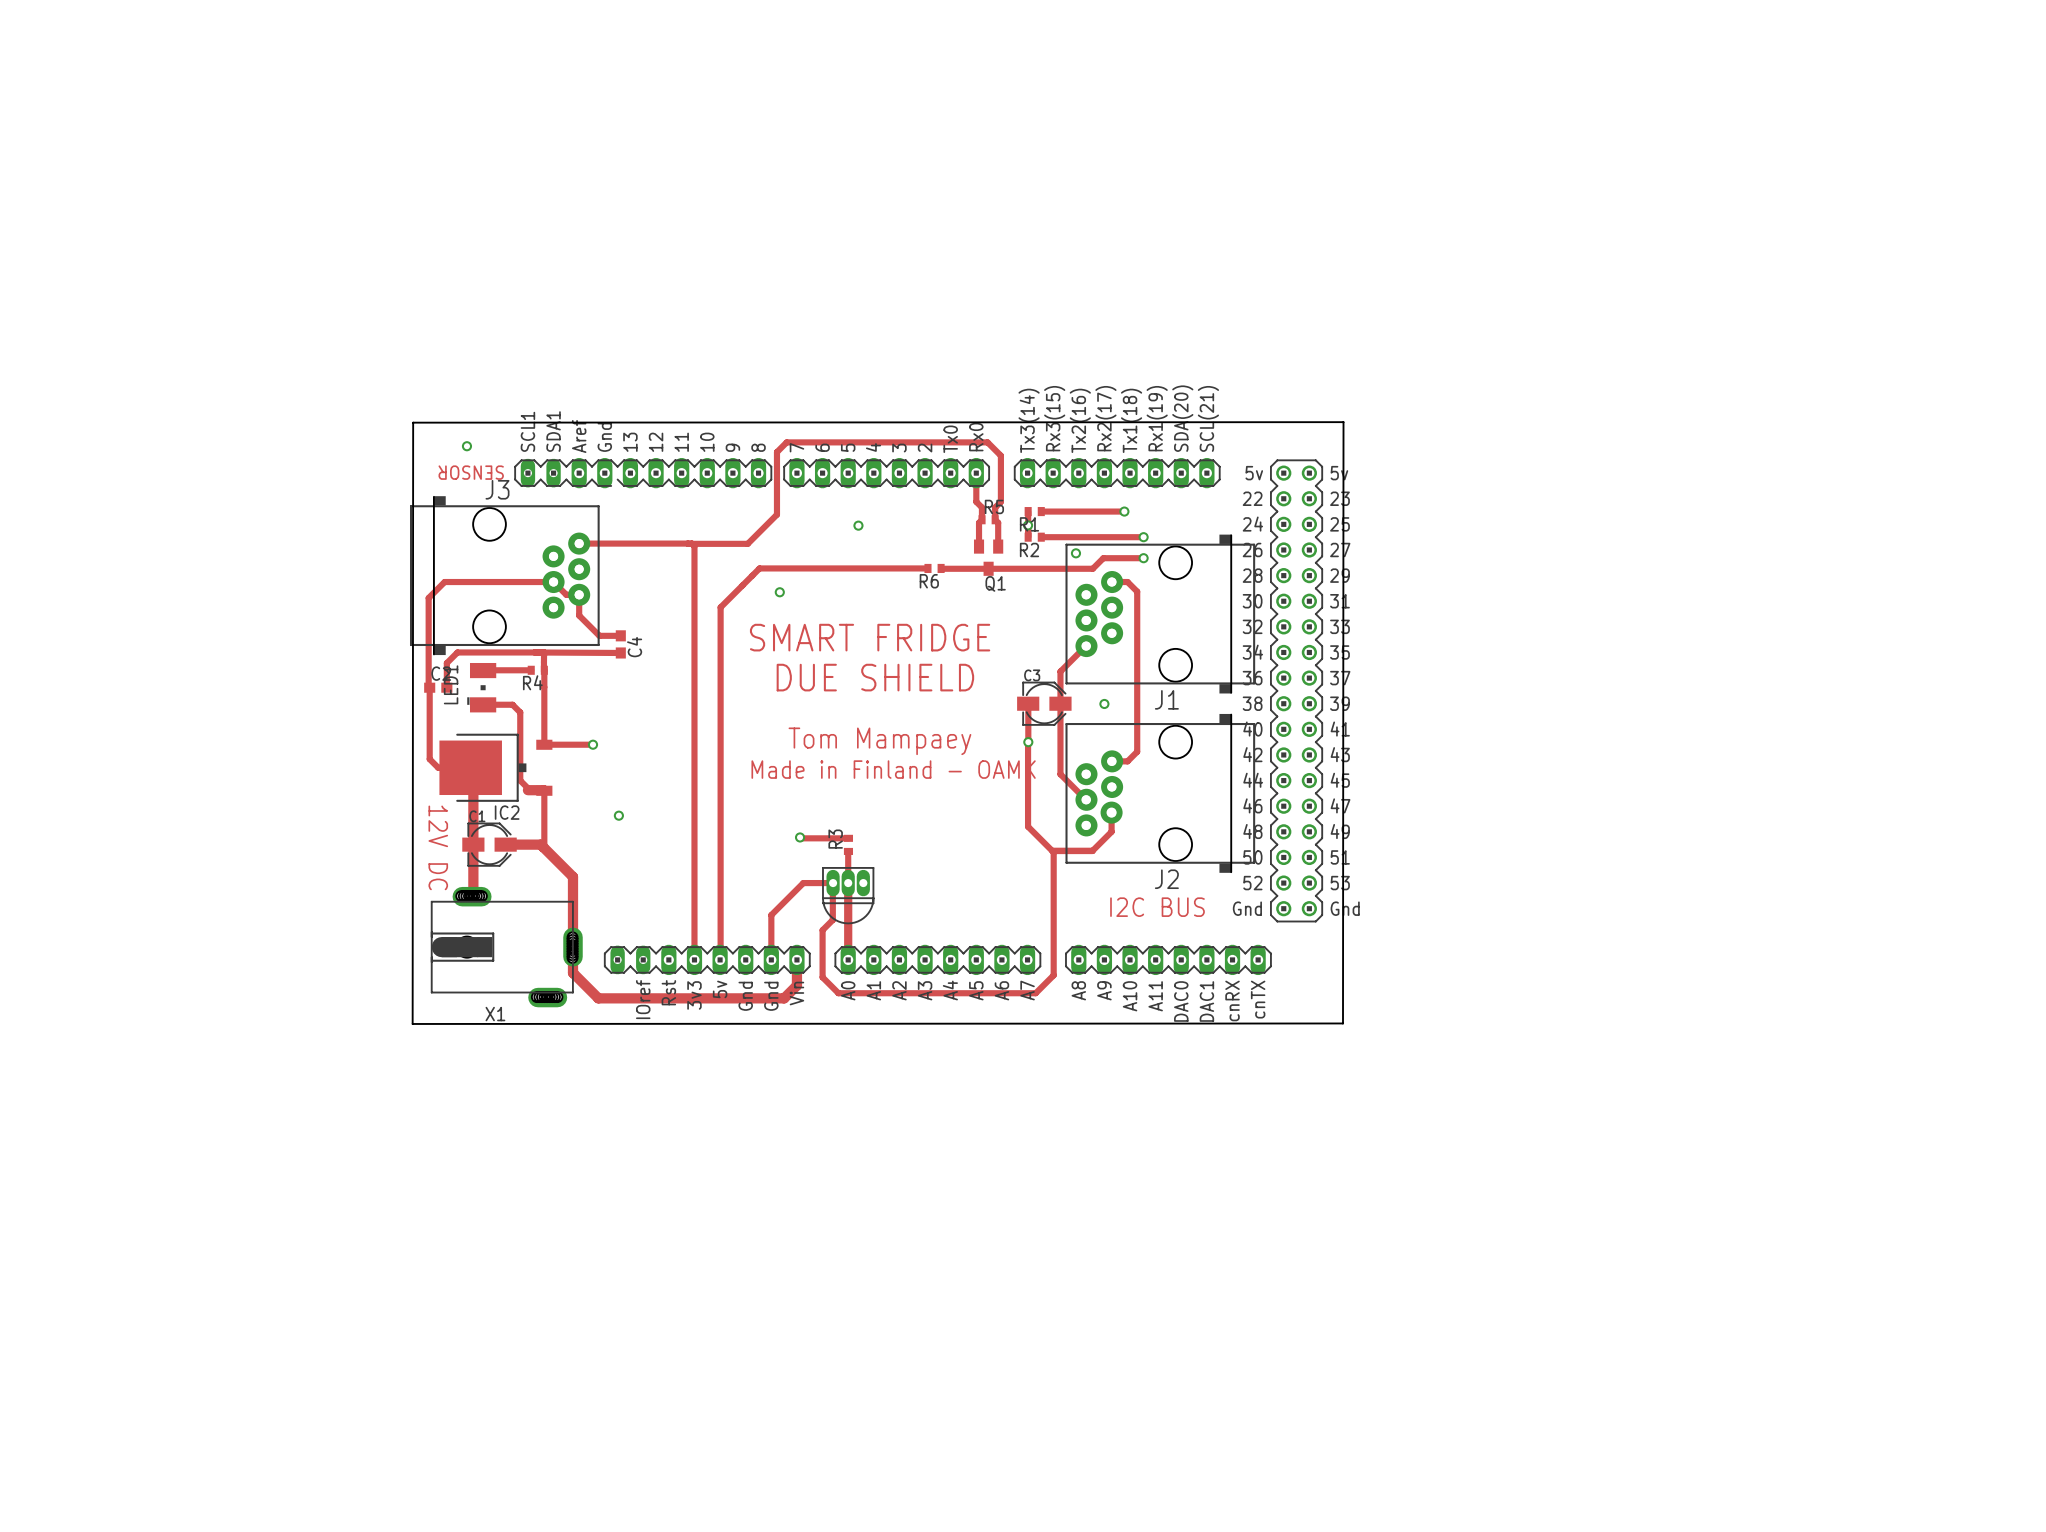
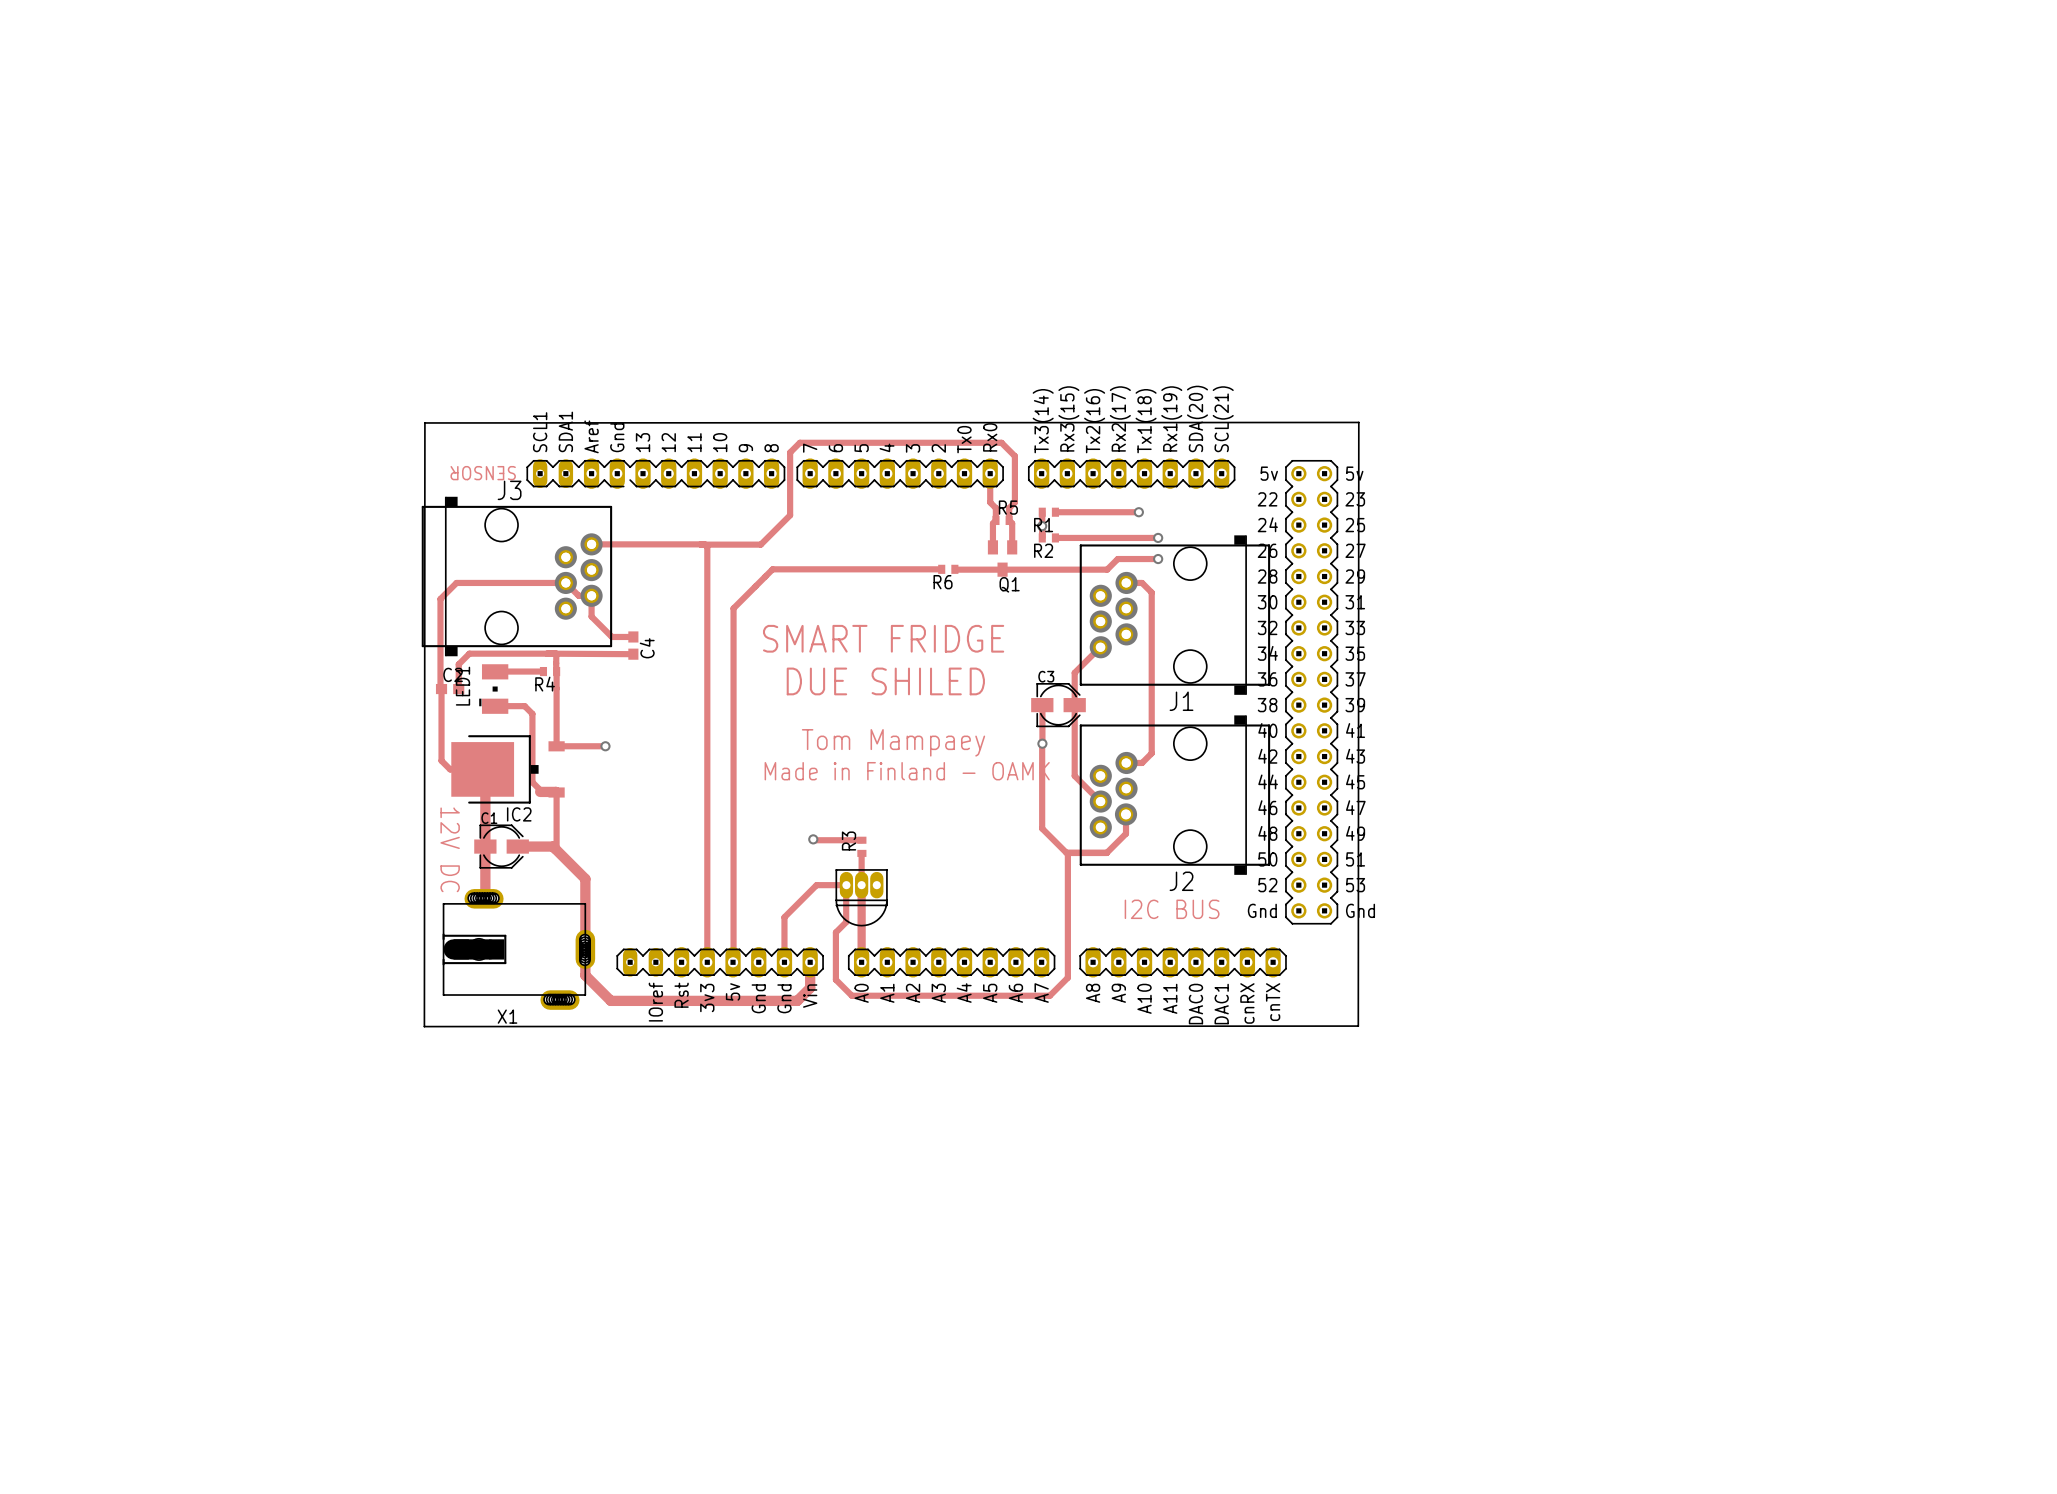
via: (466, 446) -> none
via: (858, 525) -> none
via: (1075, 553) -> none
via: (779, 592) -> none
text: DUE SHIELD (875, 677) -> DUE SHILED (885, 681)
via: (1104, 703) -> none
via: (618, 815) -> none

